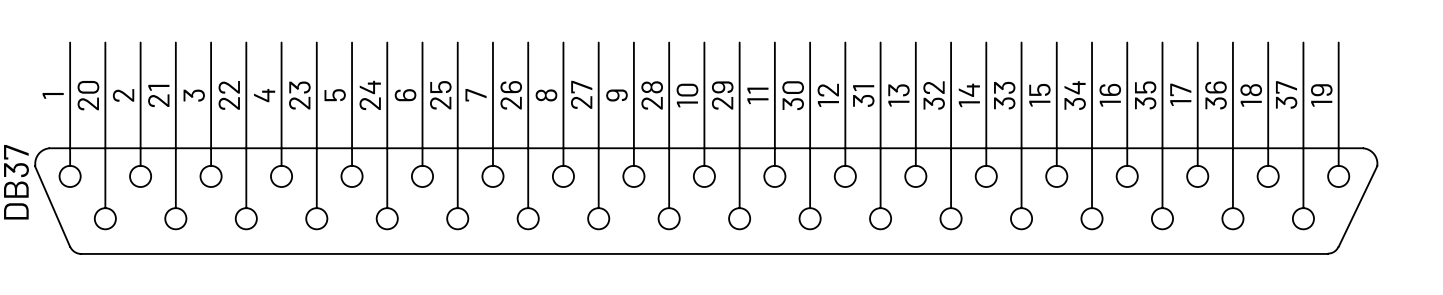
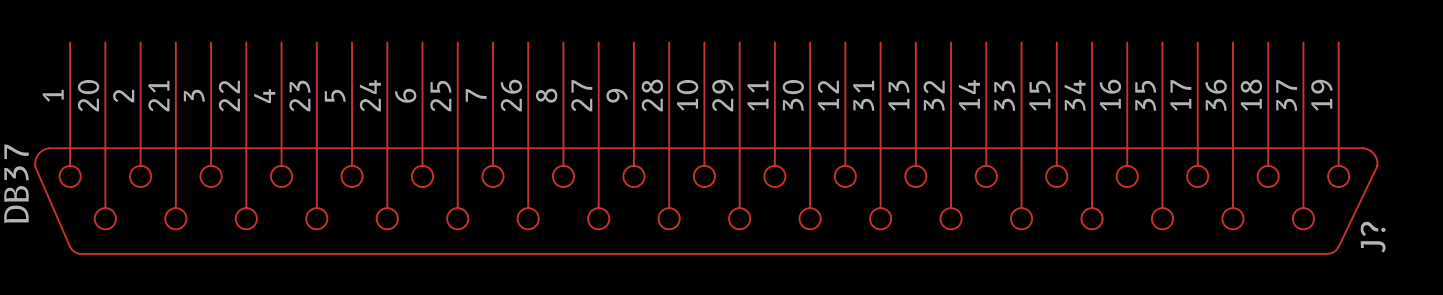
J? name: none -> J? (1373, 237)

